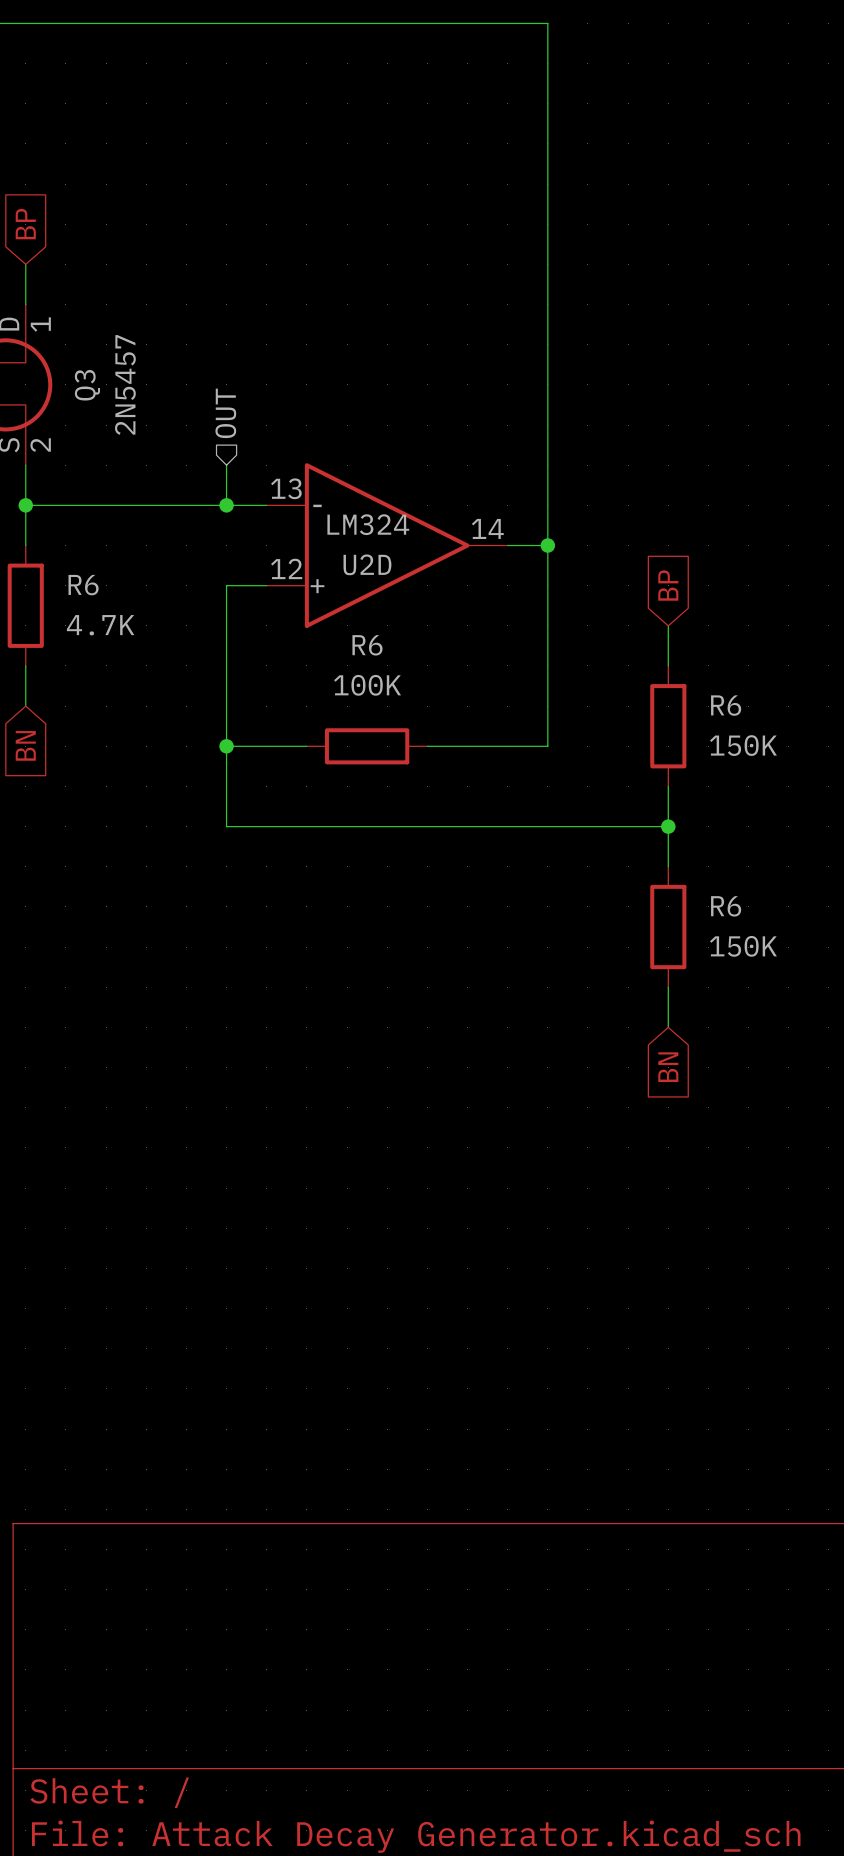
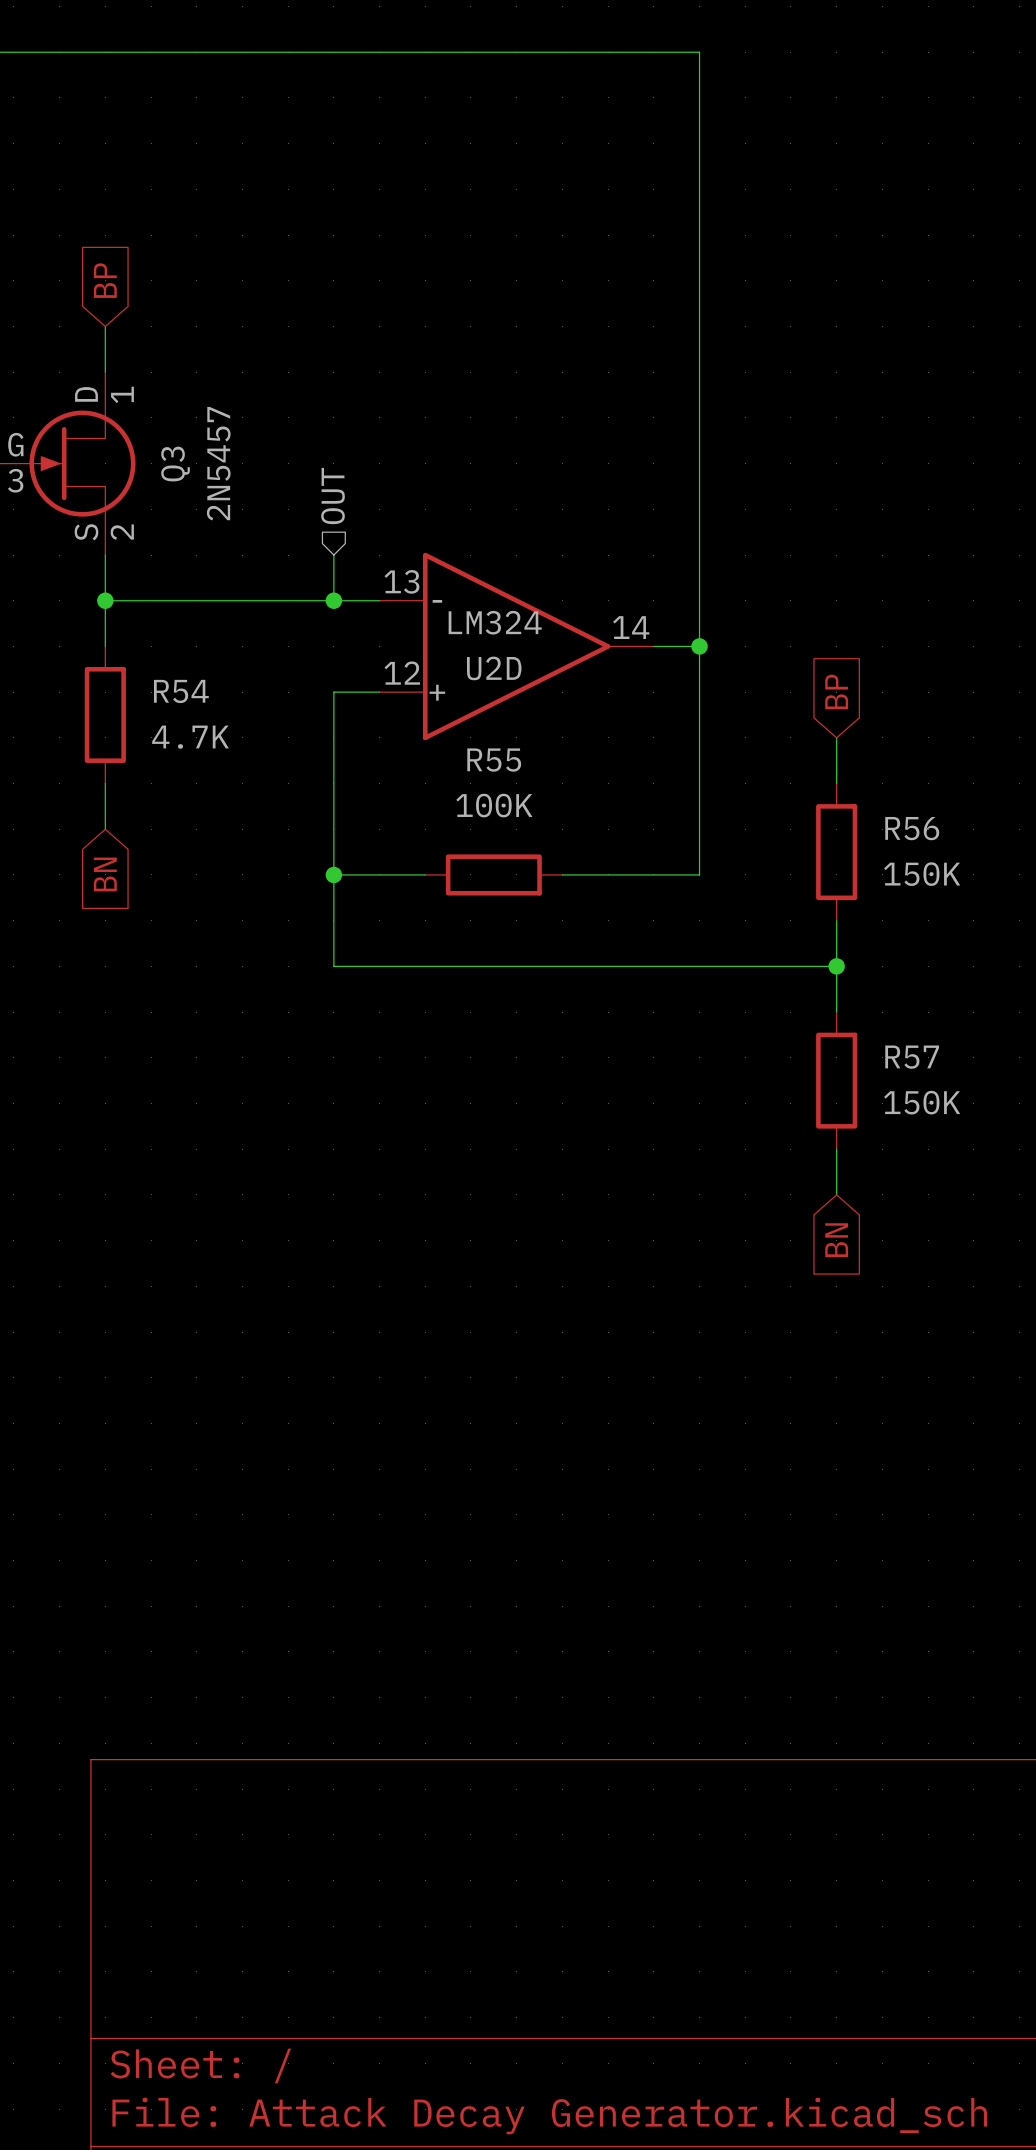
R6 name: R6 (83, 585) -> R54 (181, 691)
R6 name: R6 (367, 645) -> R55 (494, 760)
R6 name: R6 (726, 705) -> R56 (912, 828)
R6 name: R6 (726, 906) -> R57 (912, 1057)

